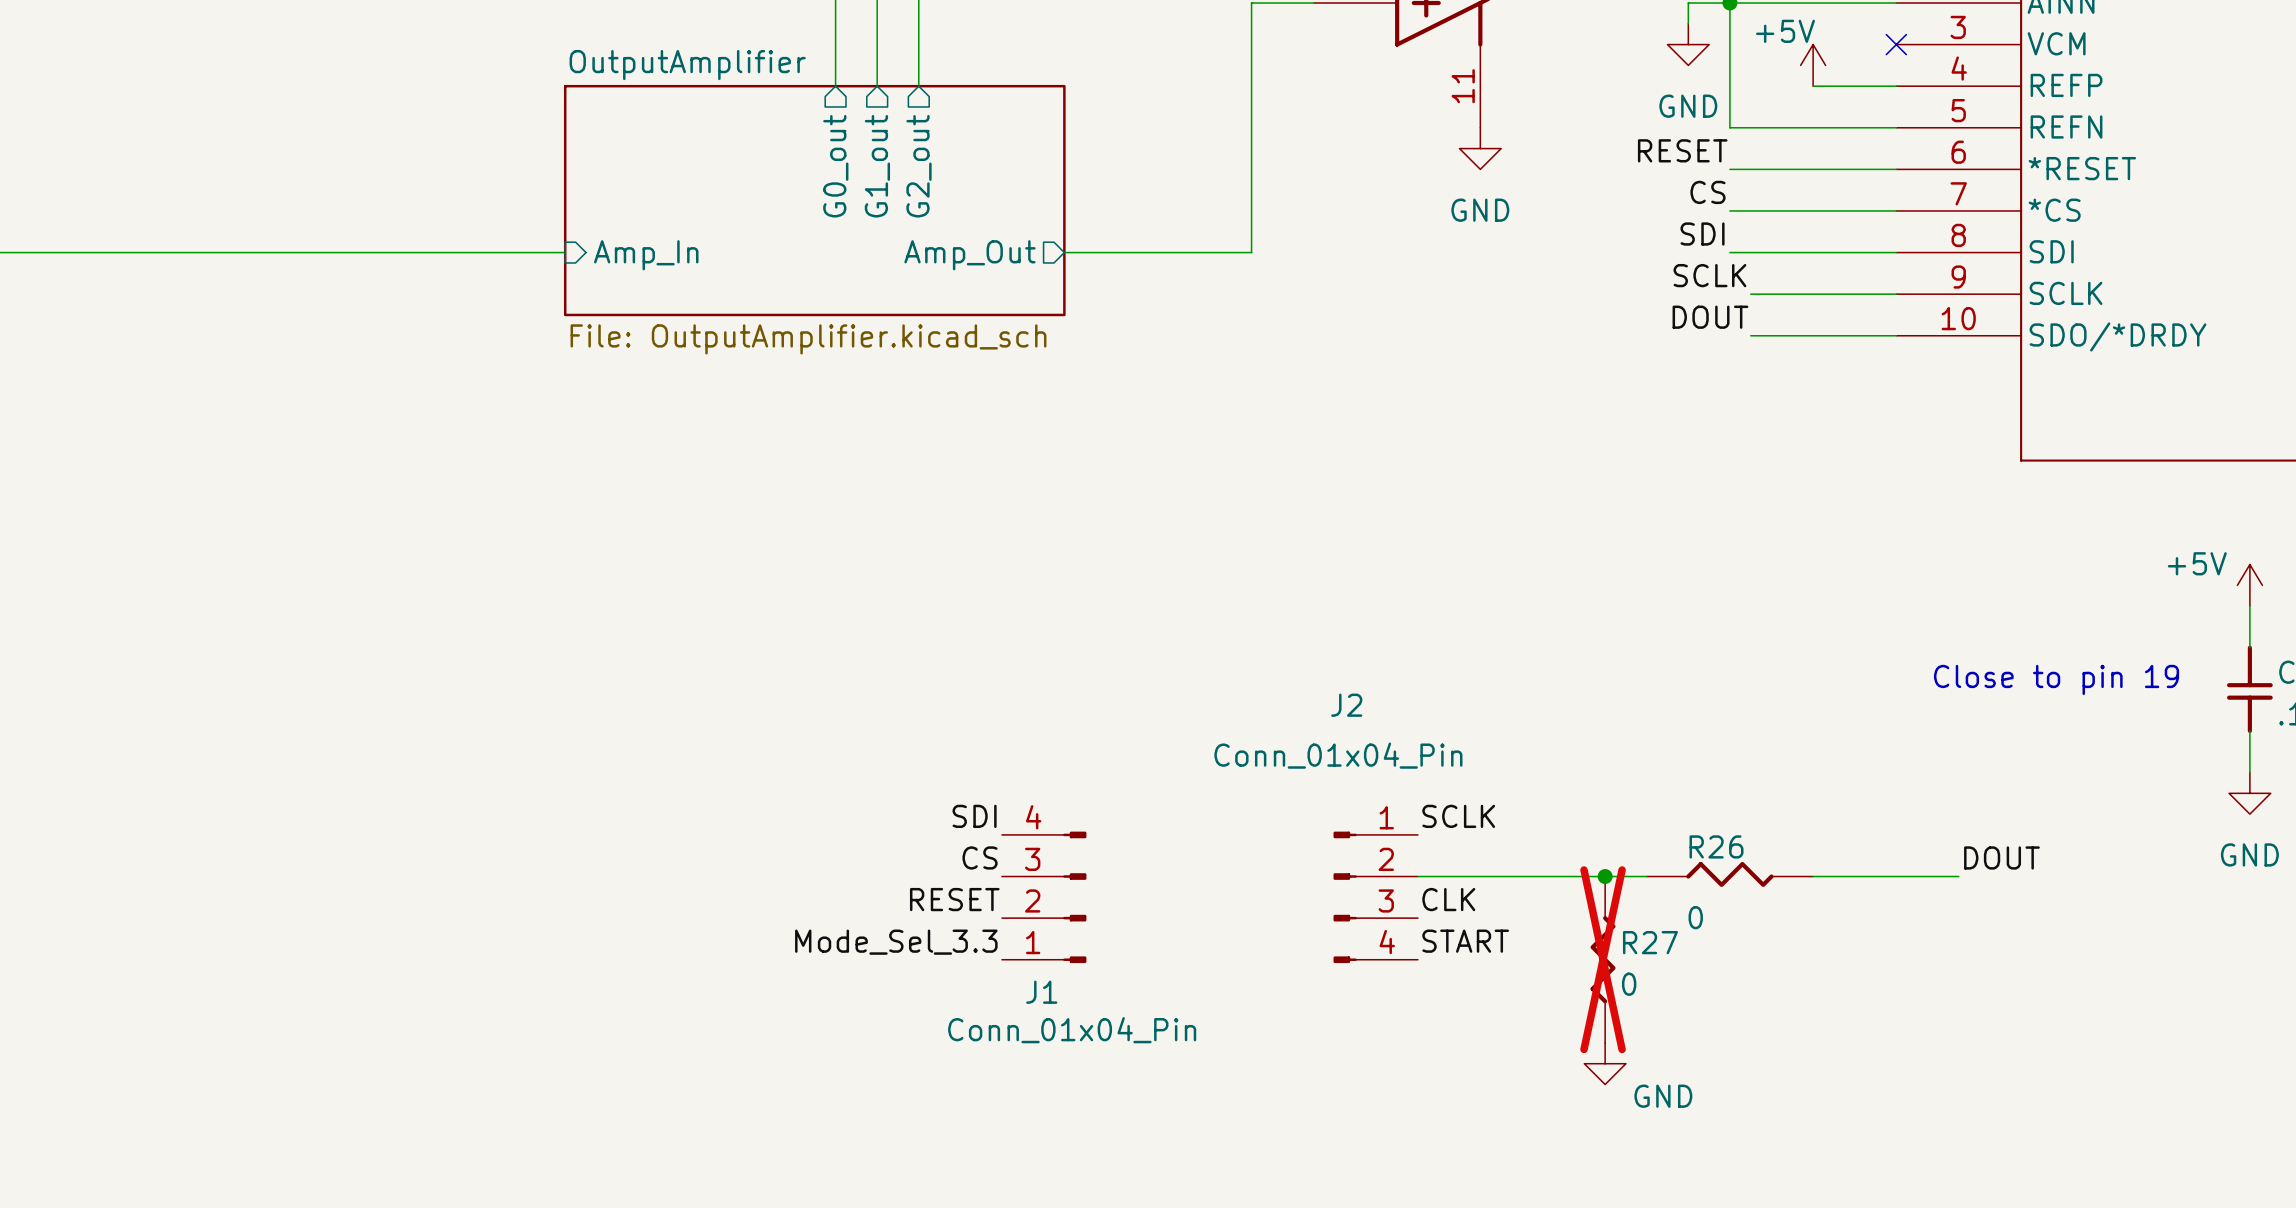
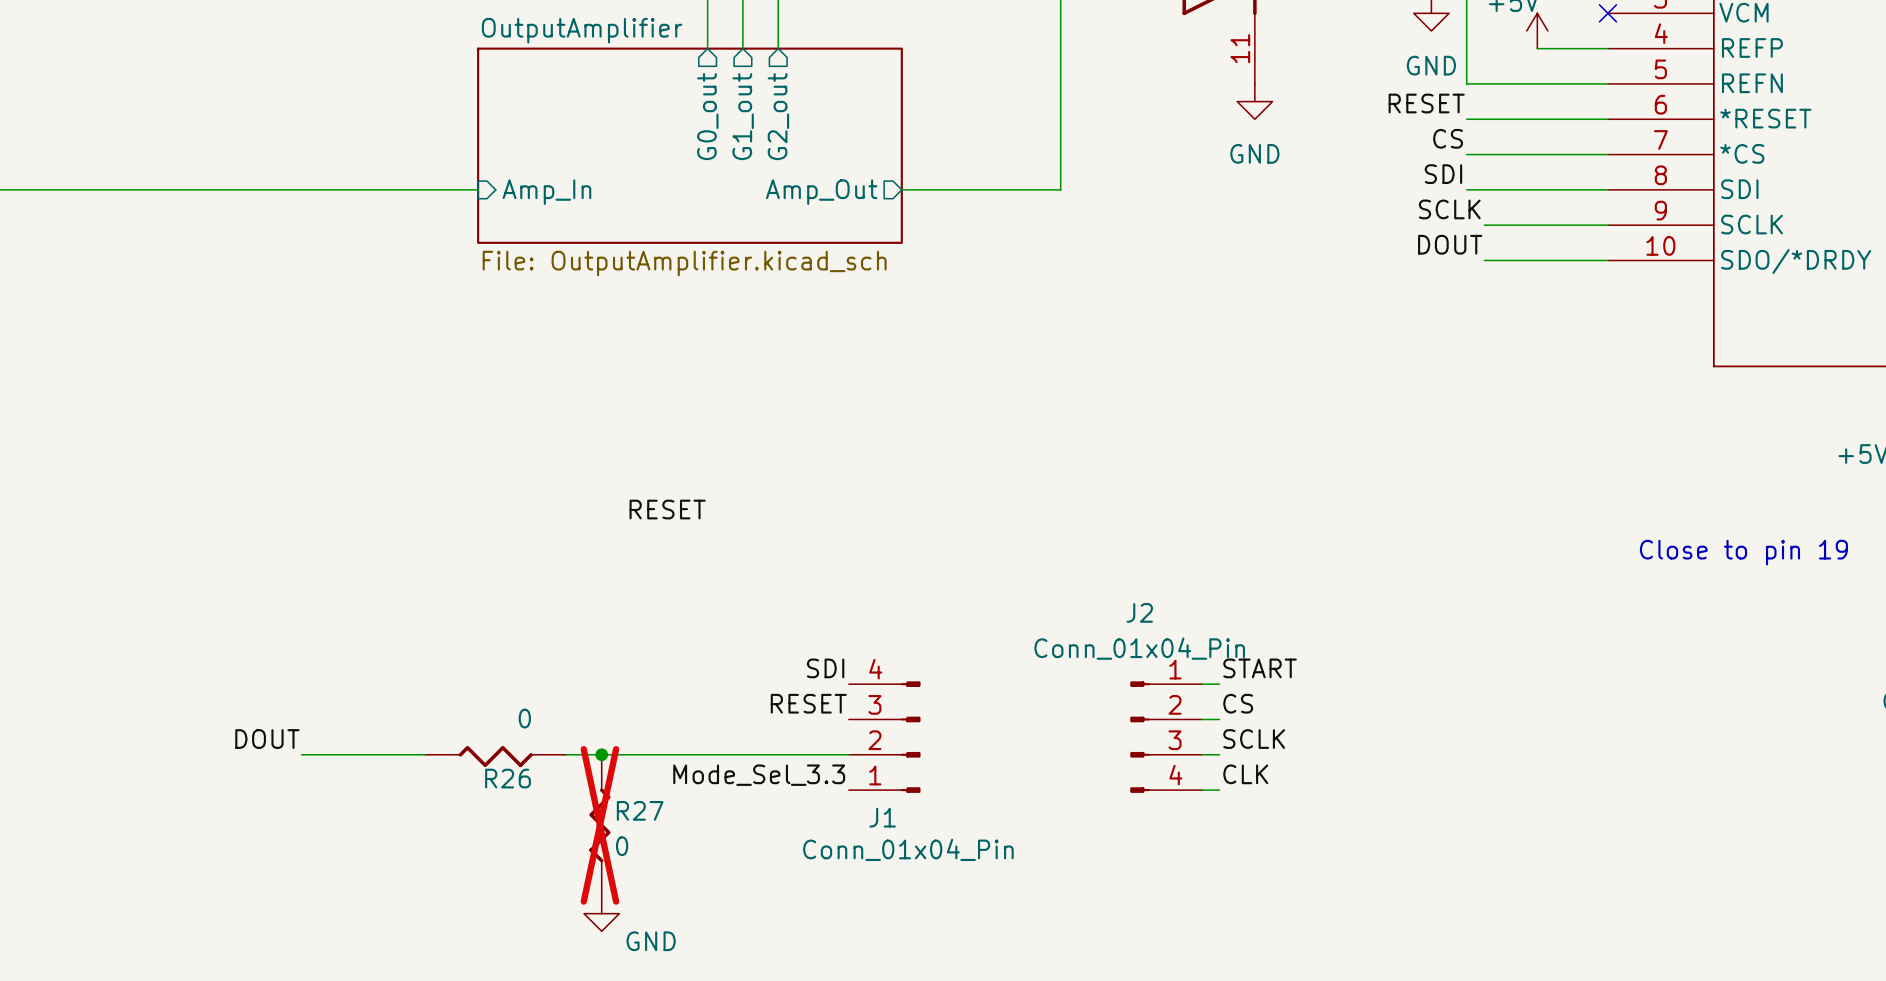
J2 name position: J2 (1346, 705) -> J2 (1139, 612)
J2 value position: Conn_01x04_Pin (1338, 755) -> Conn_01x04_Pin (1139, 648)
label position: SCLK (1458, 816) -> SCLK (1254, 739)
wire: none -> (1201, 684) (1219, 684)
label: CS (980, 857) -> RESET (808, 703)
label: none -> CS (1238, 703)
label: DOUT (2001, 857) -> none
R26 rotation: 0° (1729, 874) -> 180° (495, 756)
R26 position: (1729, 874) -> (495, 756)
wire: (1438, 876) (1646, 876) -> none
junction: (1605, 876) -> none
wire: (1813, 876) (1958, 876) -> none
label: none -> DOUT (267, 739)
label position: RESET (954, 899) -> RESET (667, 509)
label position: CLK (1448, 899) -> CLK (1245, 774)
wire: none -> (301, 754) (425, 754)
wire: none -> (566, 754) (848, 754)
junction: none -> (601, 754)
wire: none -> (1201, 754) (1219, 754)
label position: START (1465, 941) -> START (1260, 668)
wire: none -> (1201, 790) (1219, 790)
R27 position: (1603, 959) -> (599, 825)
power symbol: GND (1605, 1063) -> none
power symbol: none -> GND (601, 913)

